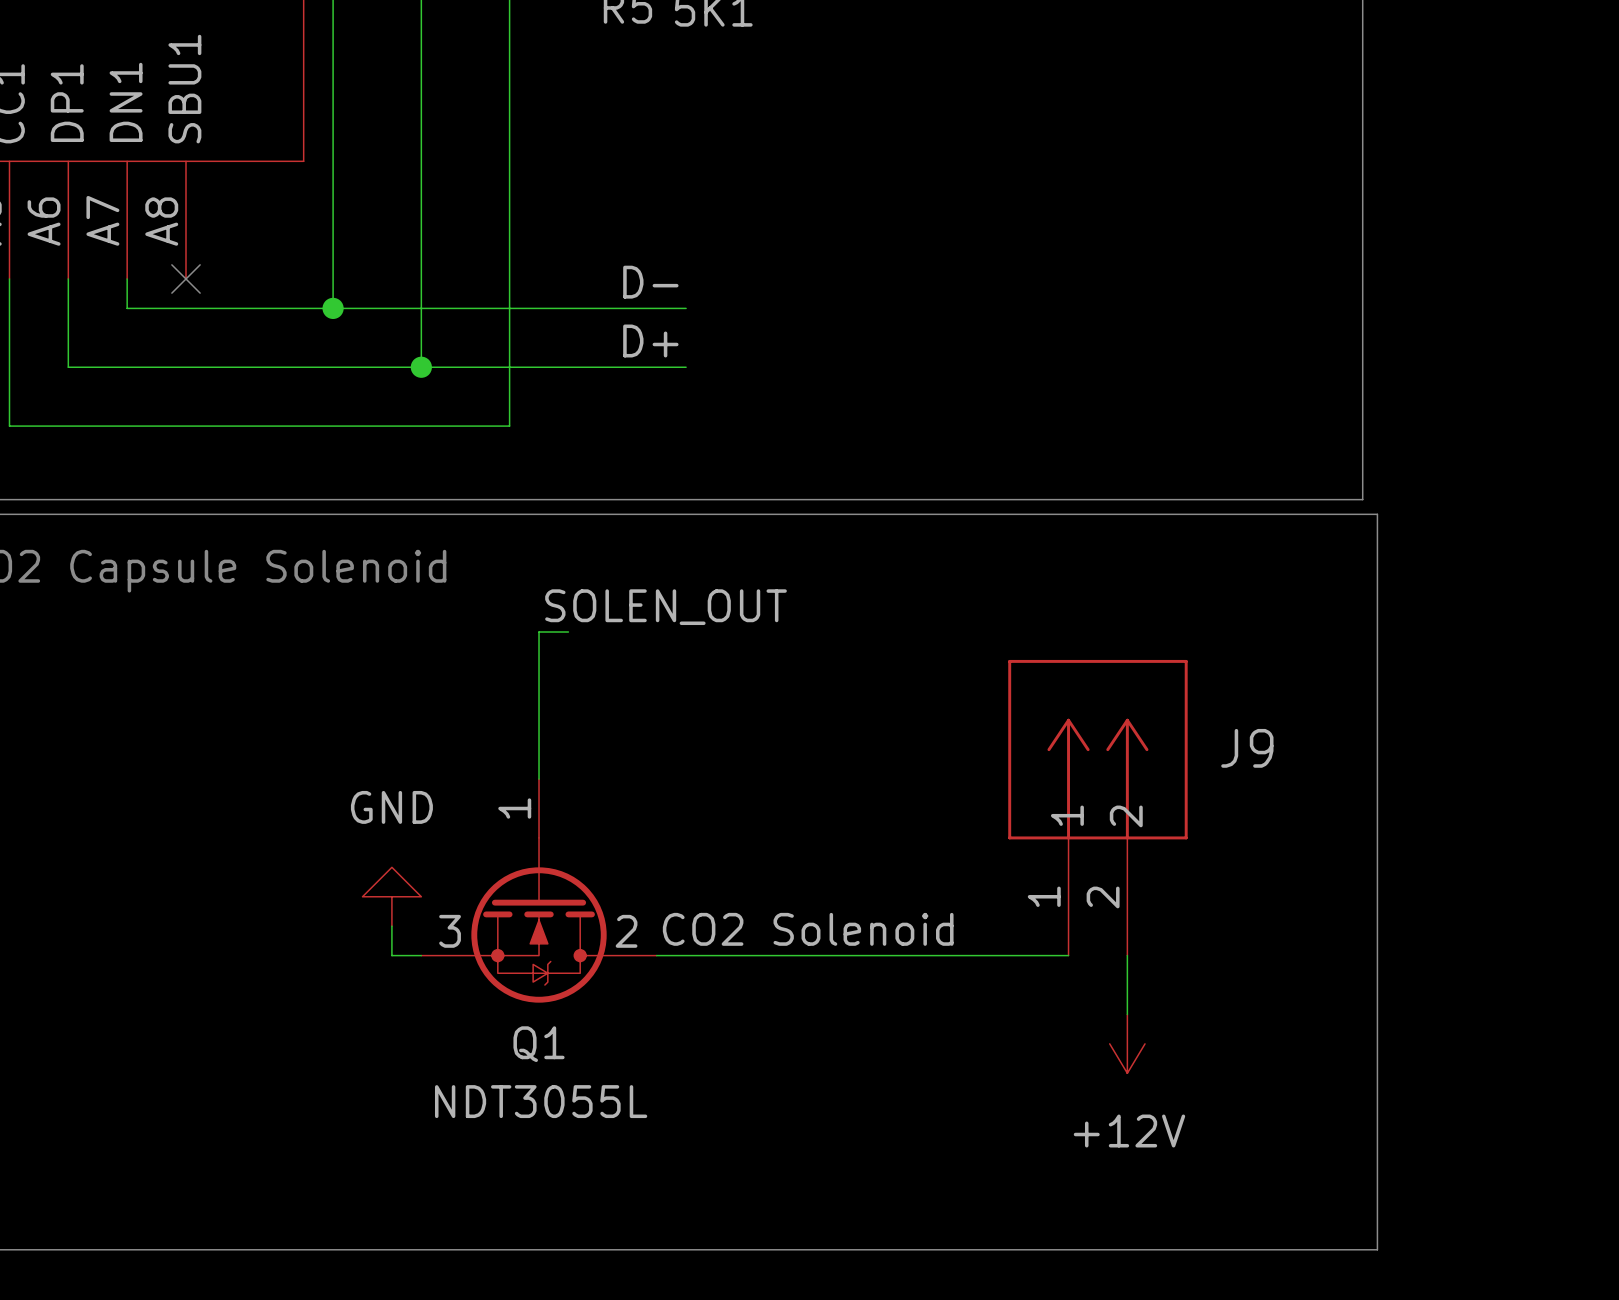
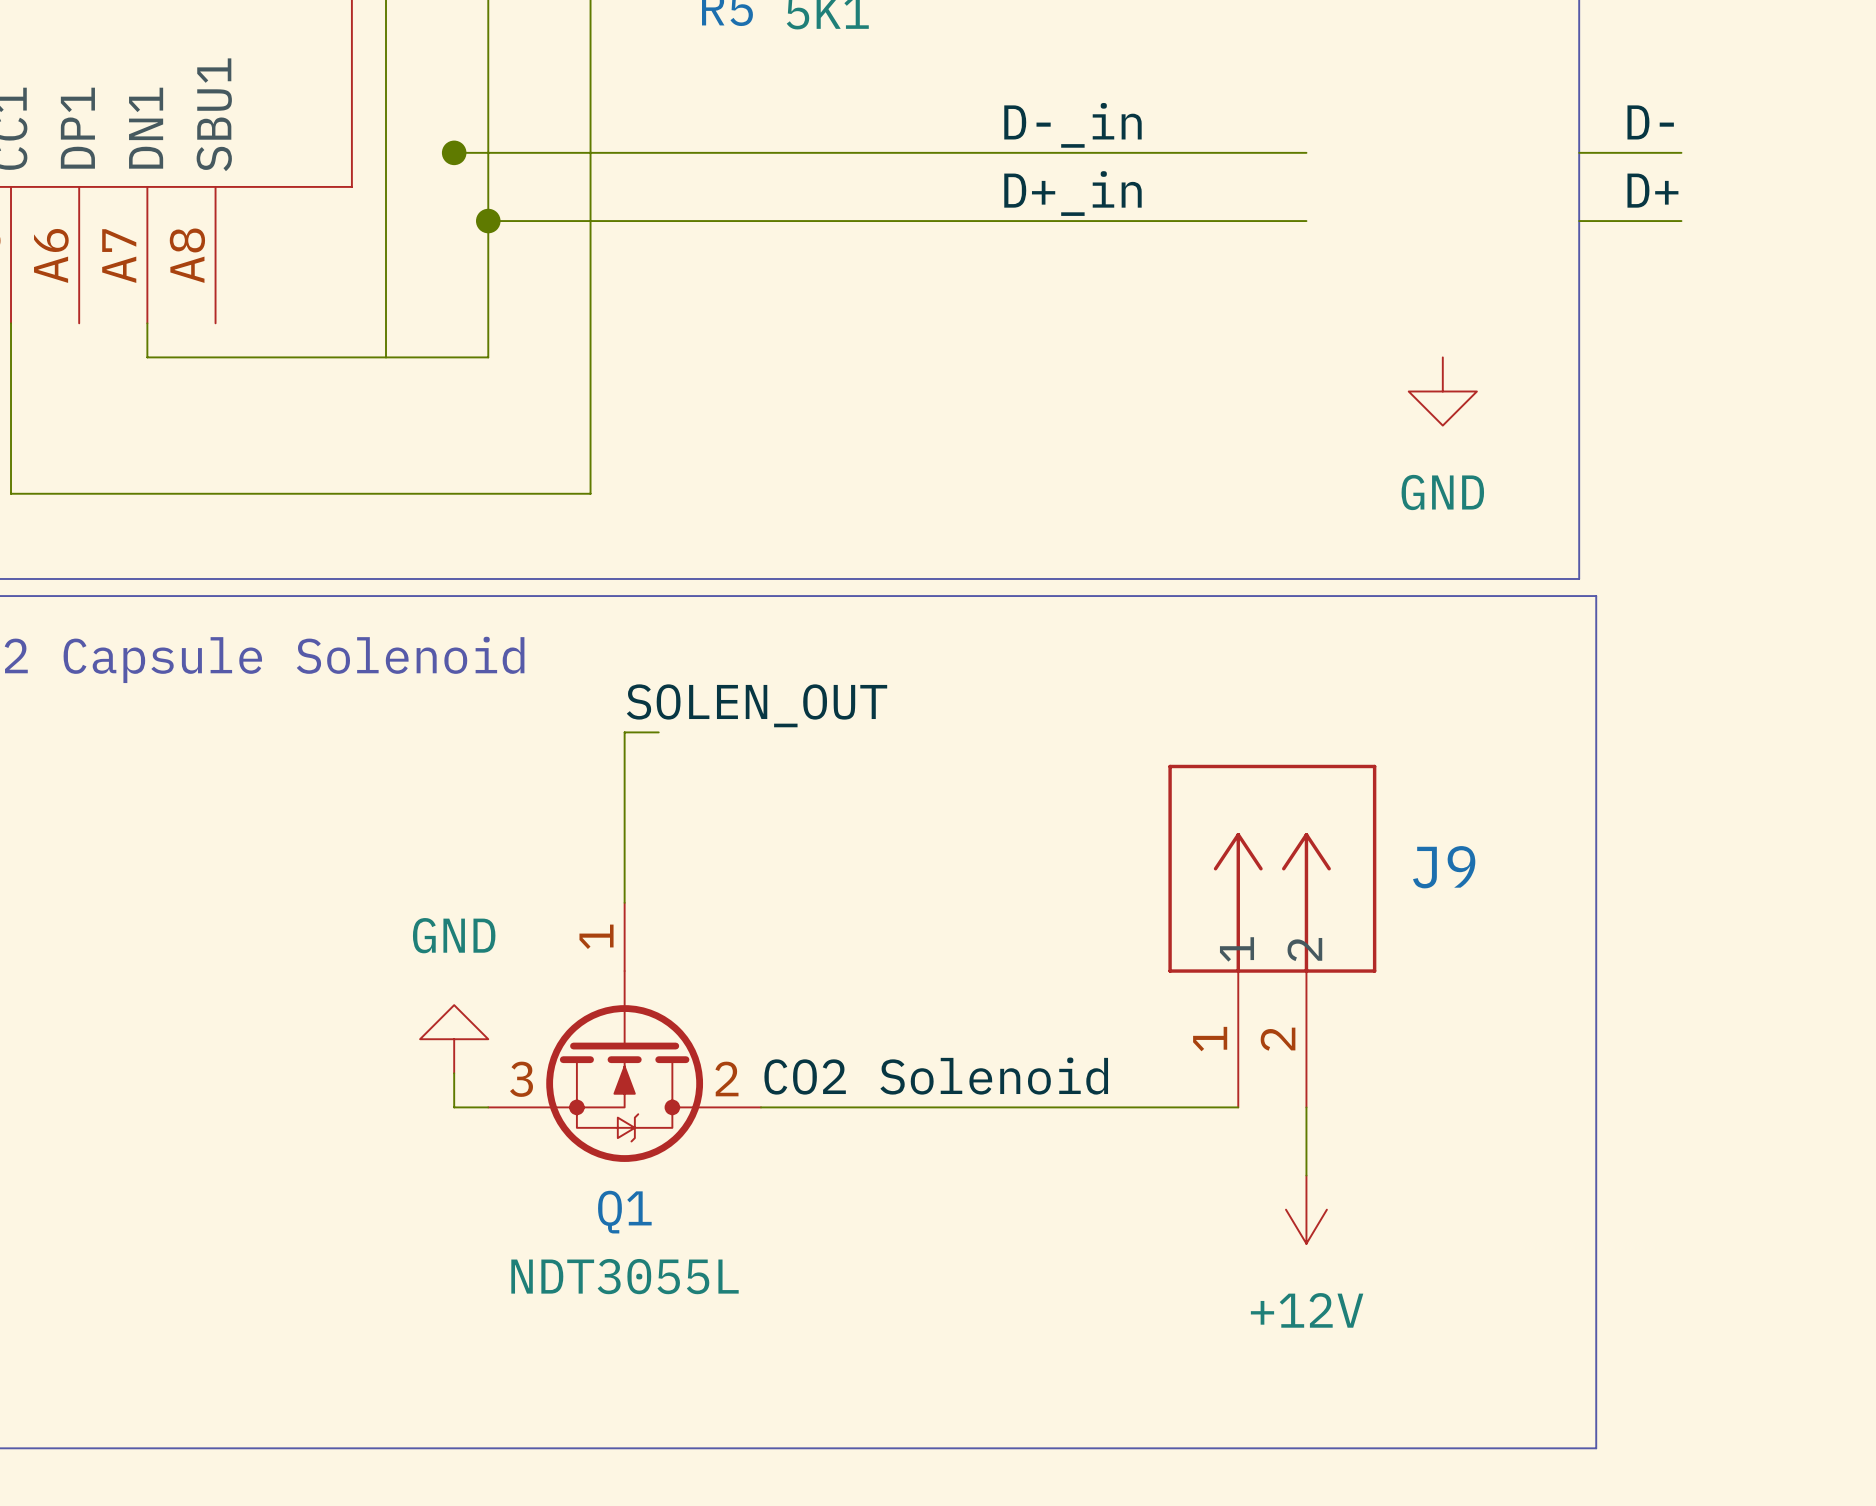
label: none -> D- (1650, 122)
label: none -> D-_in (1072, 125)
wire: none -> (454, 152) (1306, 152)
junction: none -> (454, 152)
wire: none -> (1579, 152) (1681, 152)
label: none -> D+ (1652, 190)
label: none -> D+_in (1072, 193)
wire: none -> (488, 221) (1306, 221)
junction: none -> (488, 221)
wire: none -> (1579, 221) (1681, 221)
wire: (68, 278) (68, 367) (686, 367) -> none
no-connect mark: (186, 278) -> none
label: D- (650, 282) -> none
junction: (333, 308) -> none
wire: (686, 308) (421, 308) (421, 367) -> none
power symbol: none -> GND (1442, 391)
label: D+ (650, 340) -> none
junction: (421, 367) -> none

